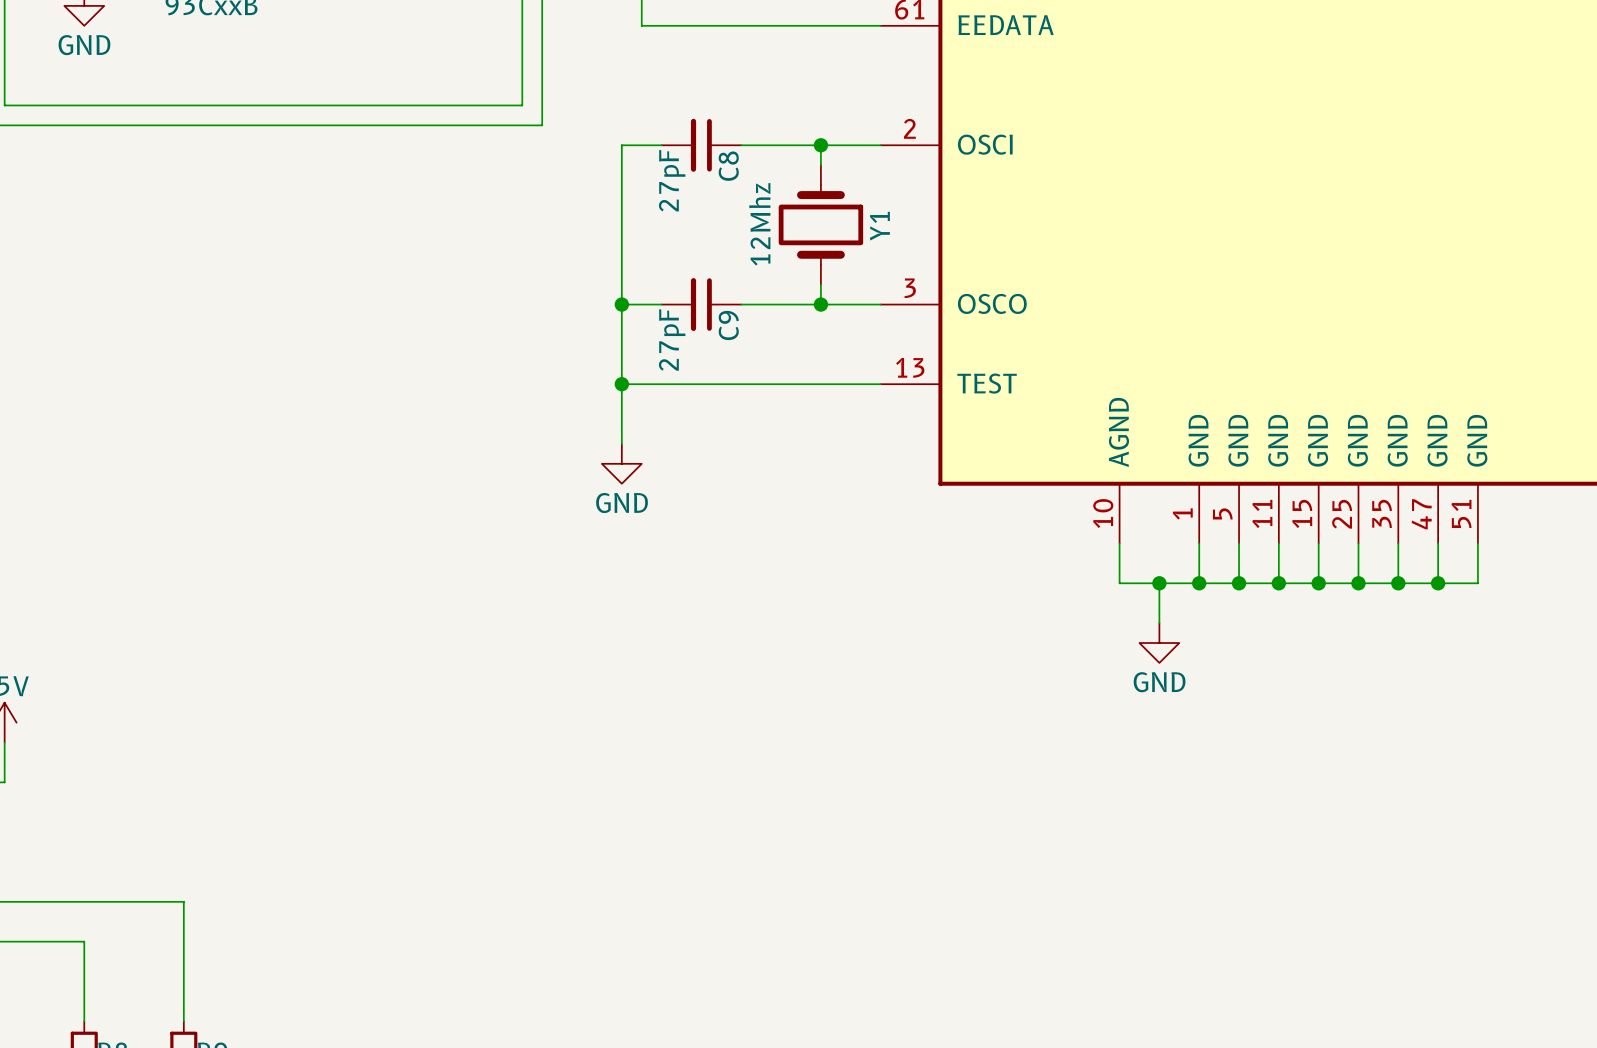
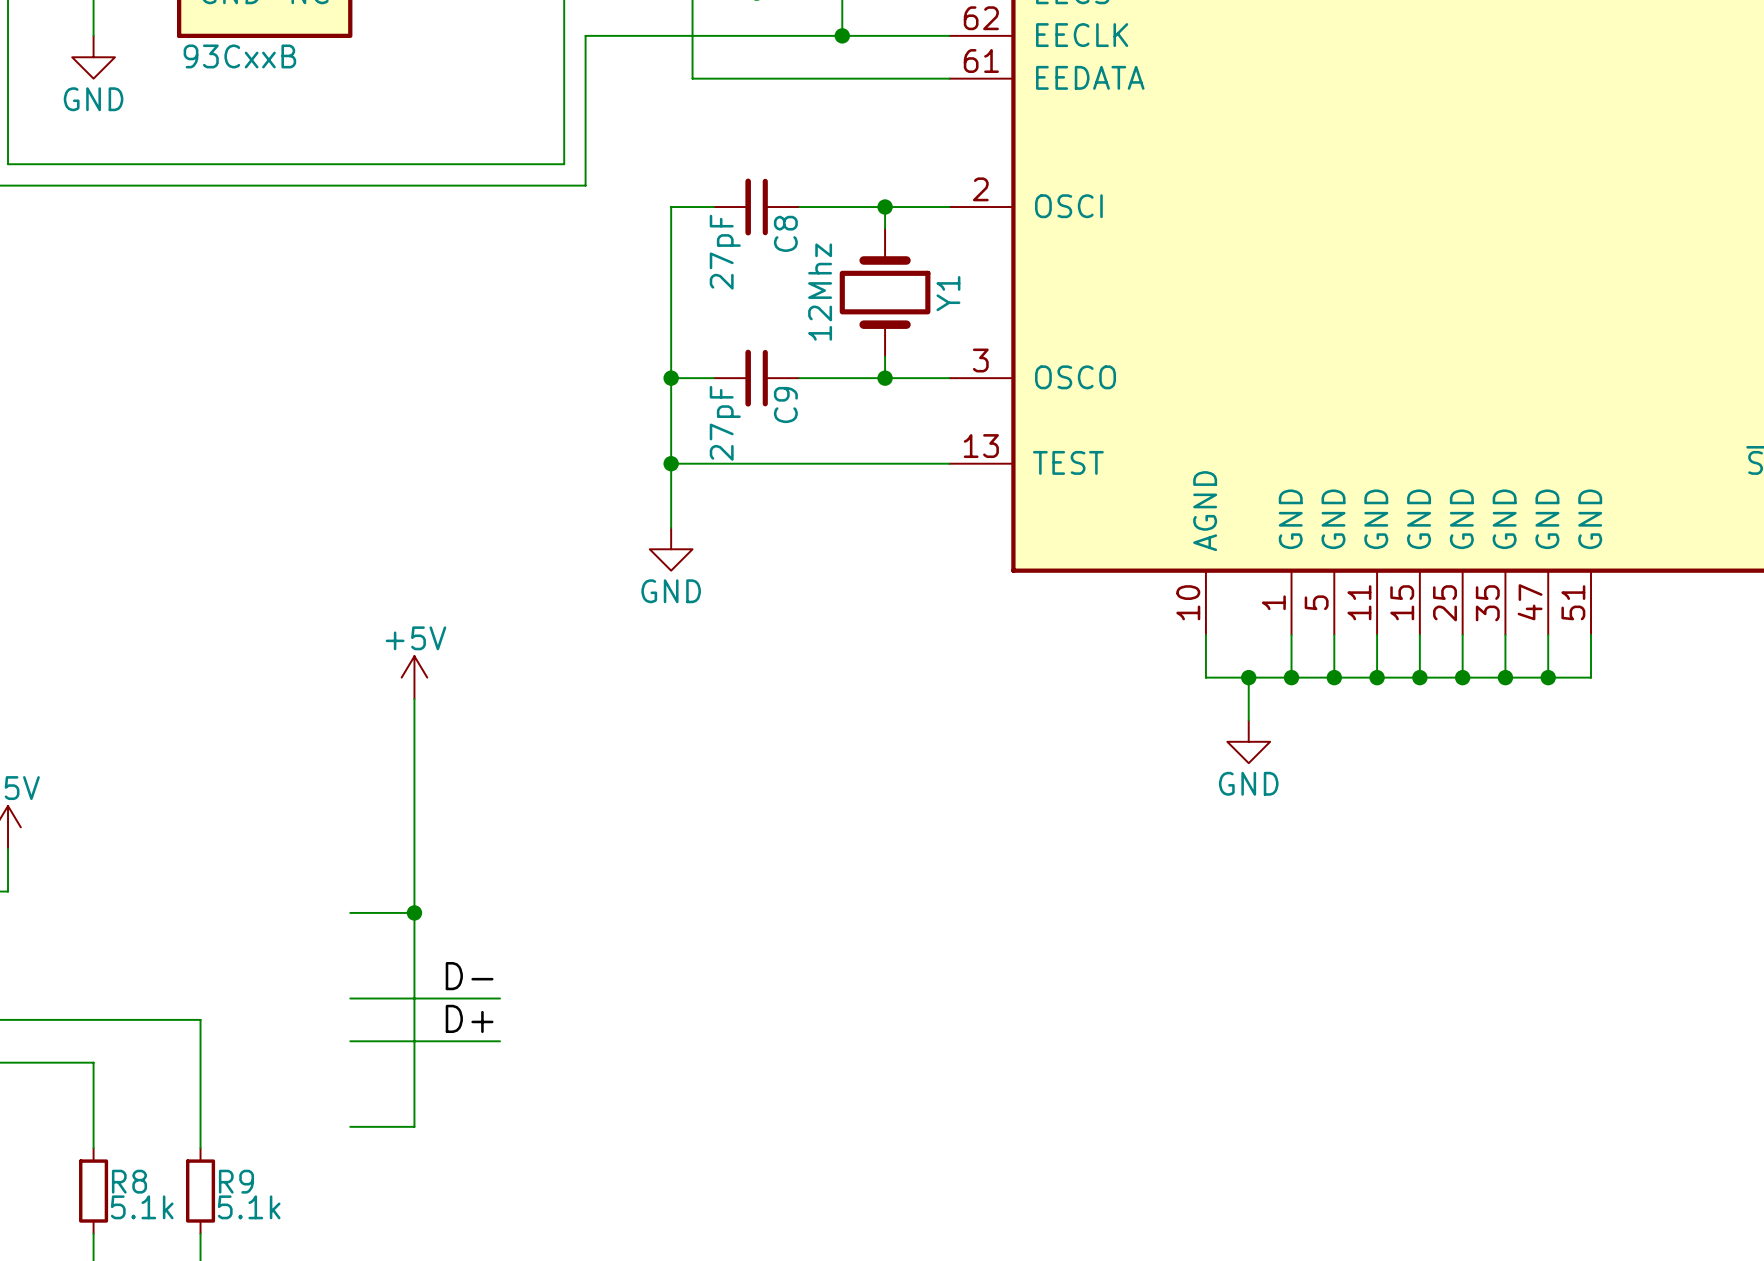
power symbol: none -> +5V (414, 677)
wire: none -> (414, 699) (414, 1126) (350, 1126)
wire: none -> (350, 912) (414, 912)
junction: none -> (414, 912)
label: none -> D- (469, 976)
wire: none -> (350, 998) (500, 998)
label: none -> D+ (469, 1018)
wire: none -> (350, 1041) (500, 1041)

